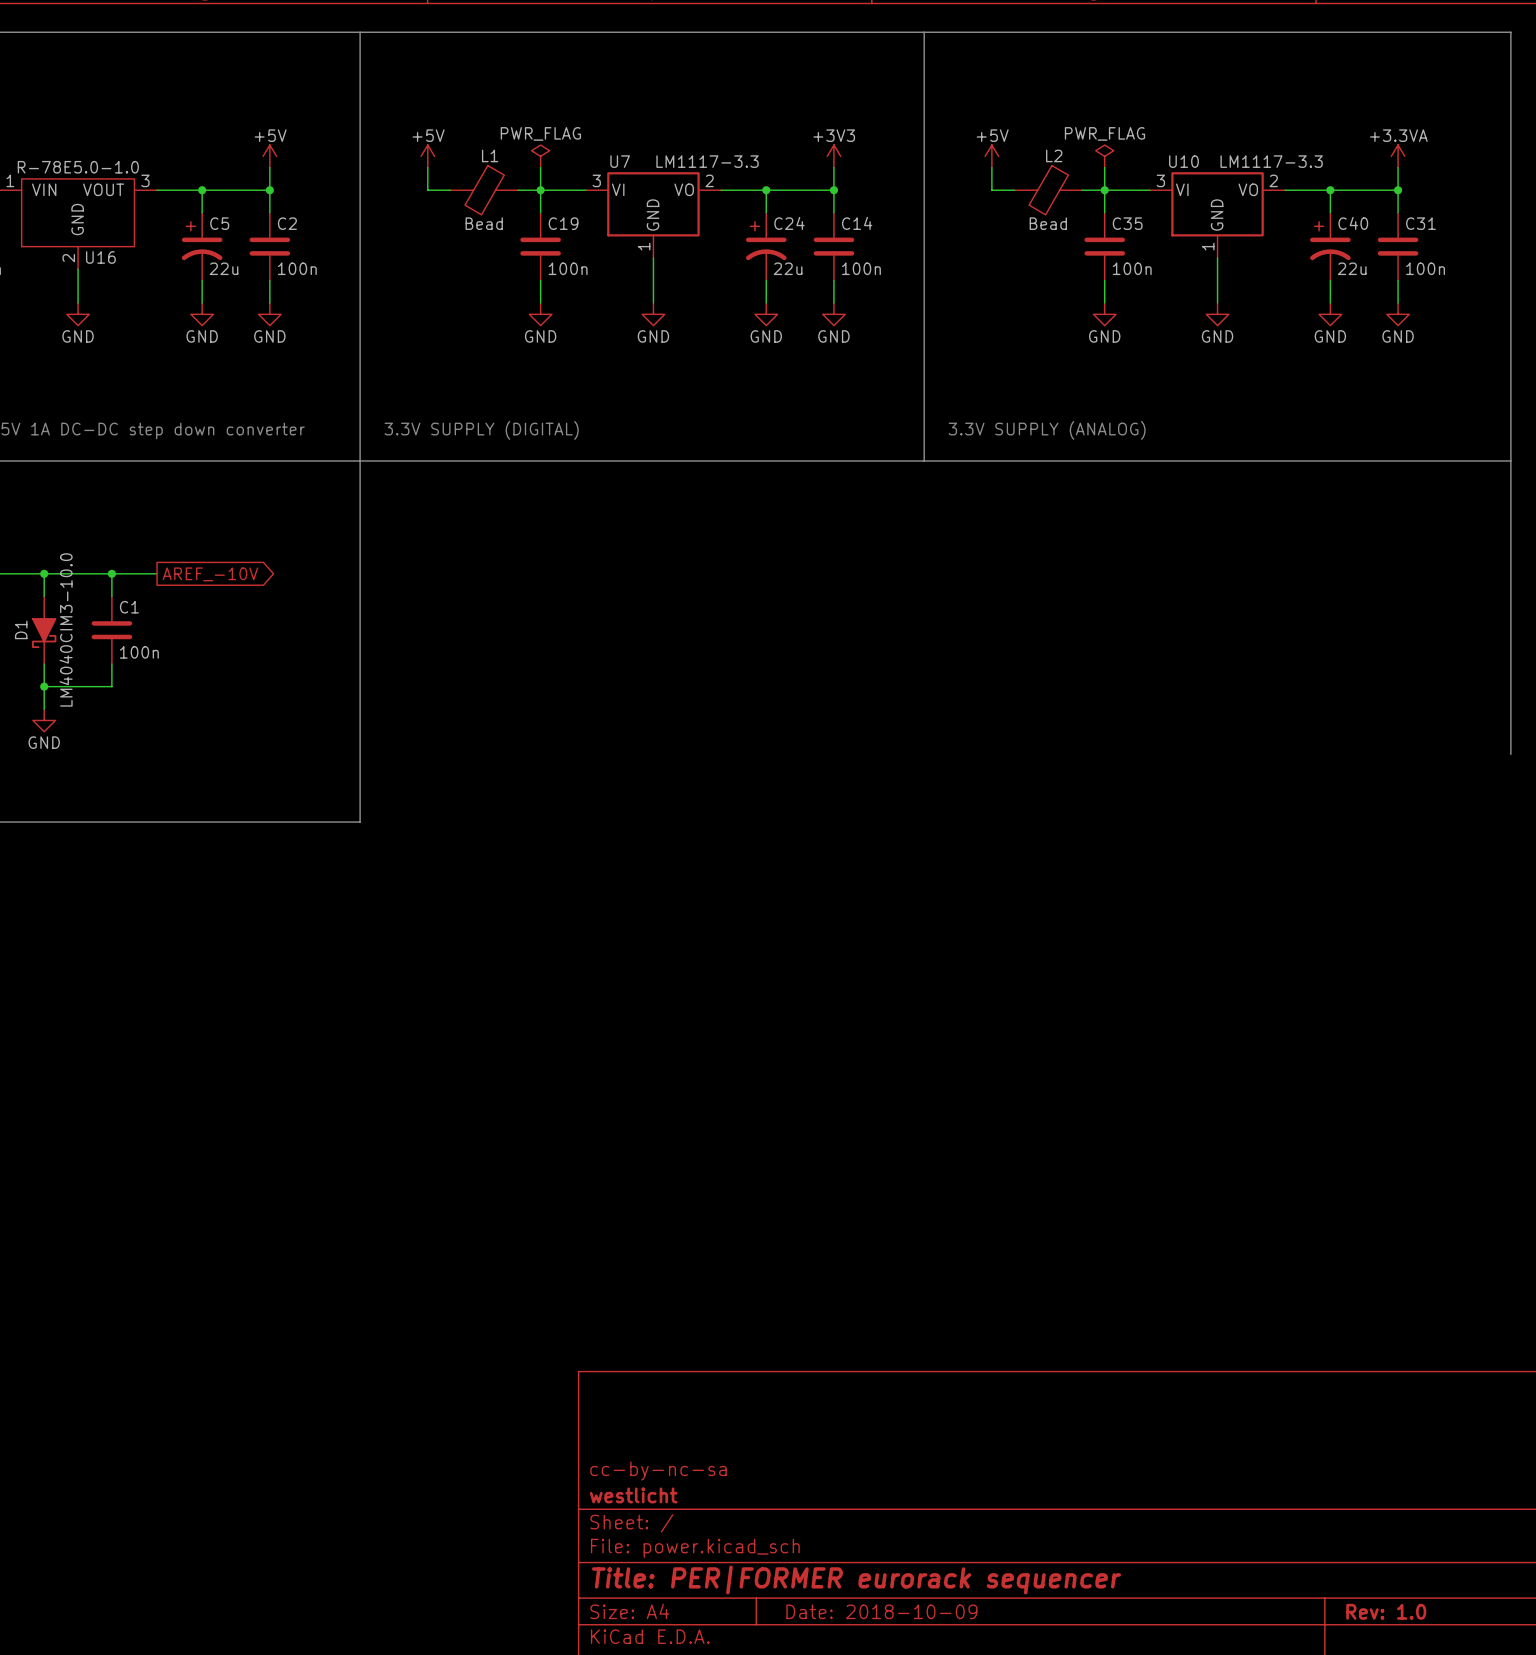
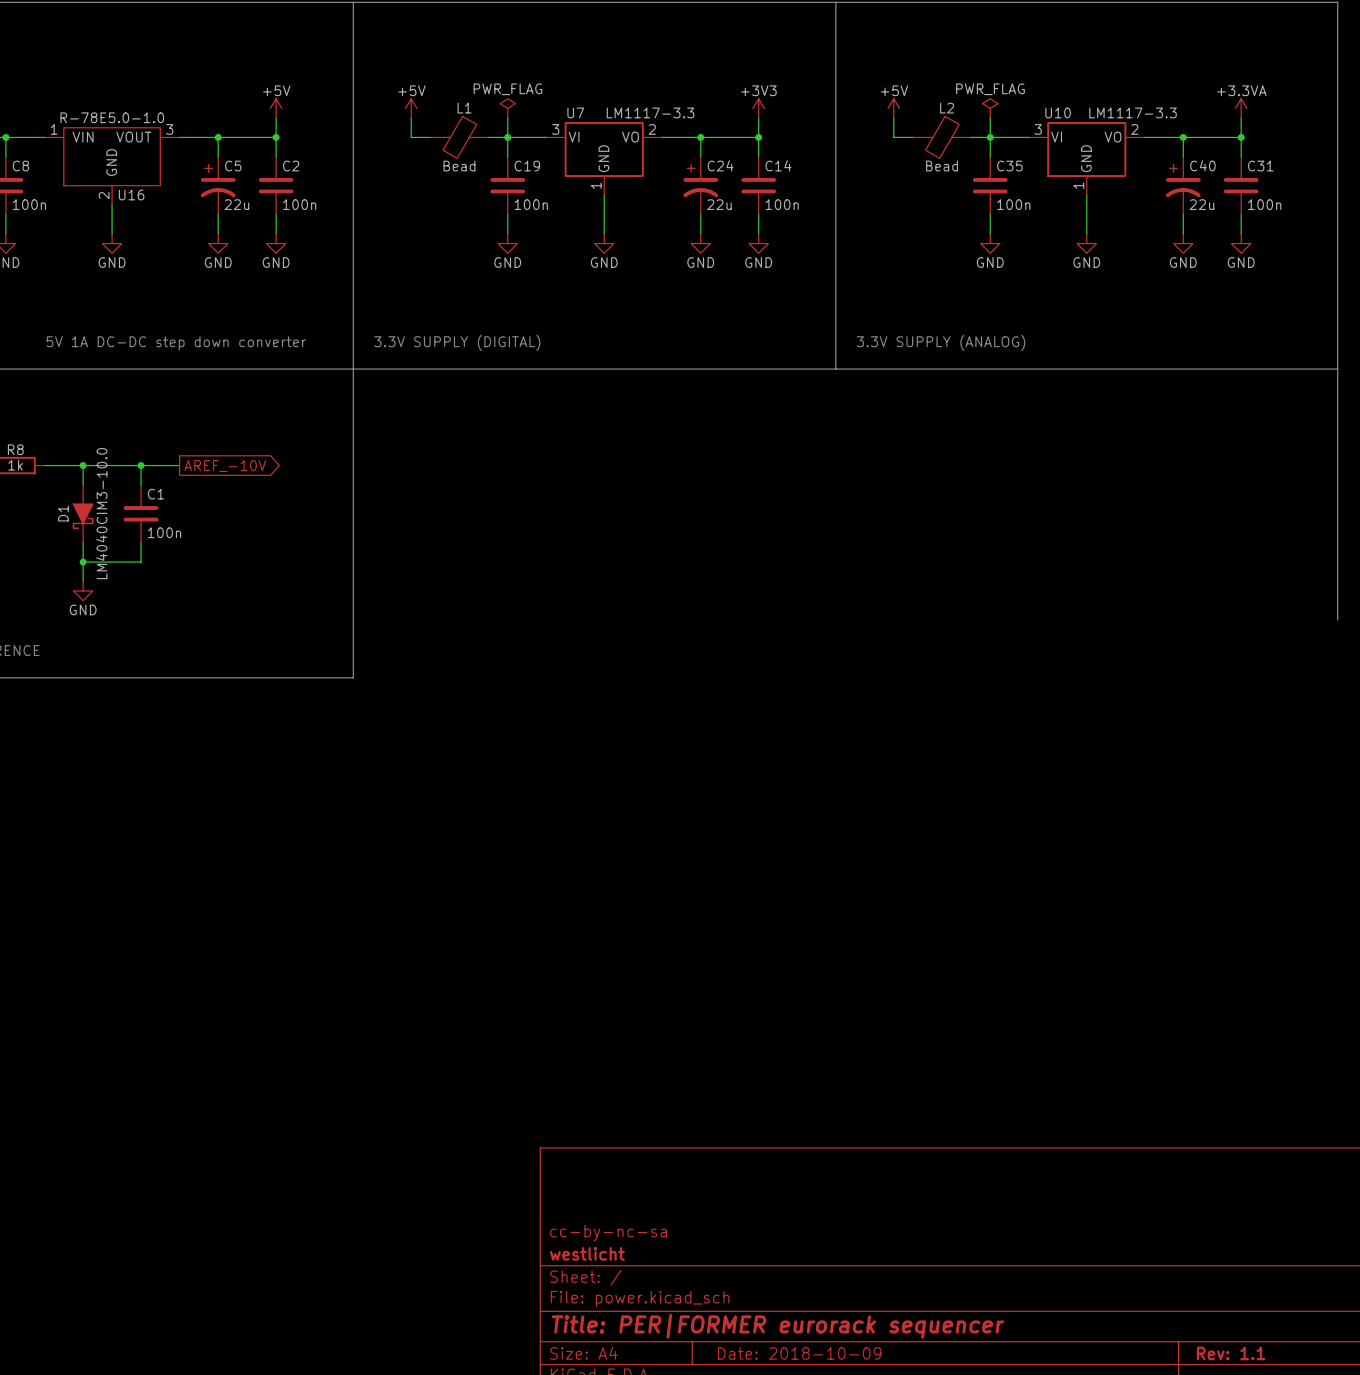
title block: Rev: 1.0 (1386, 1611) -> Rev: 1.1 (1231, 1353)

